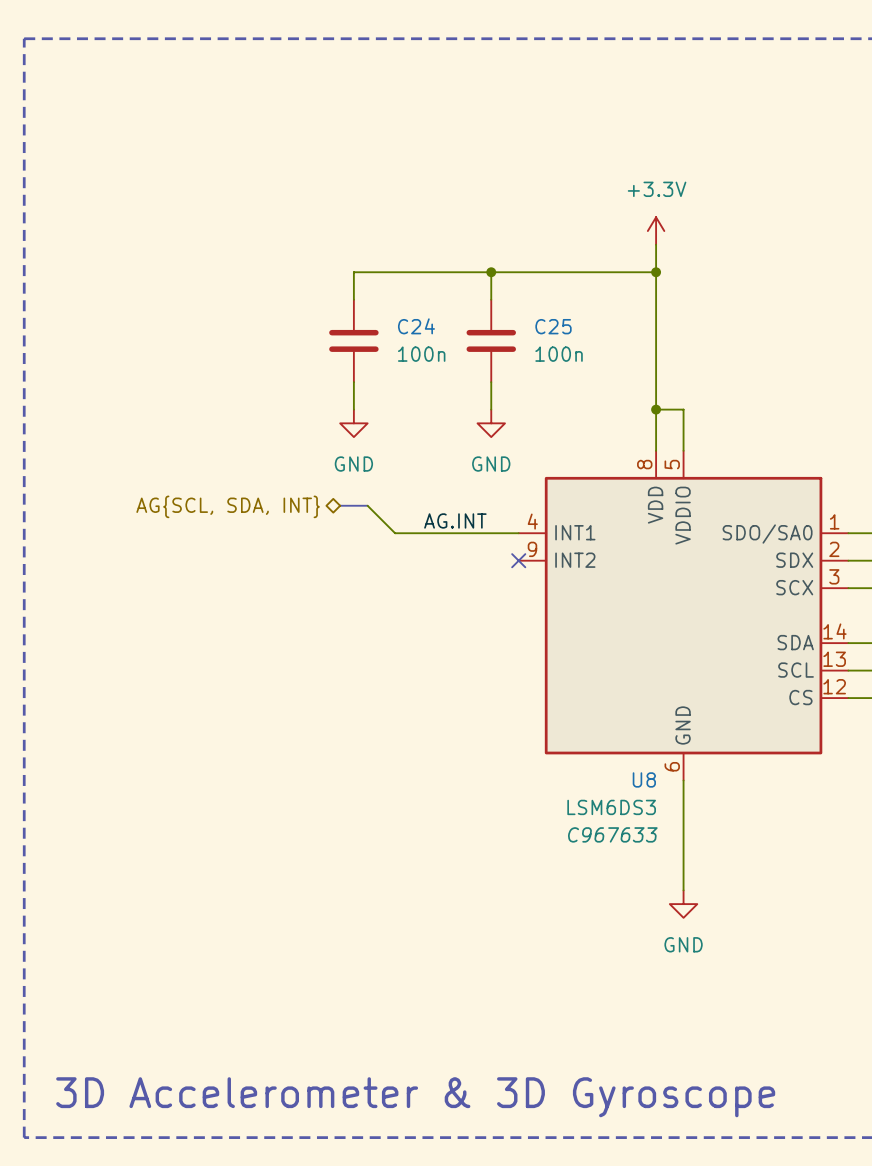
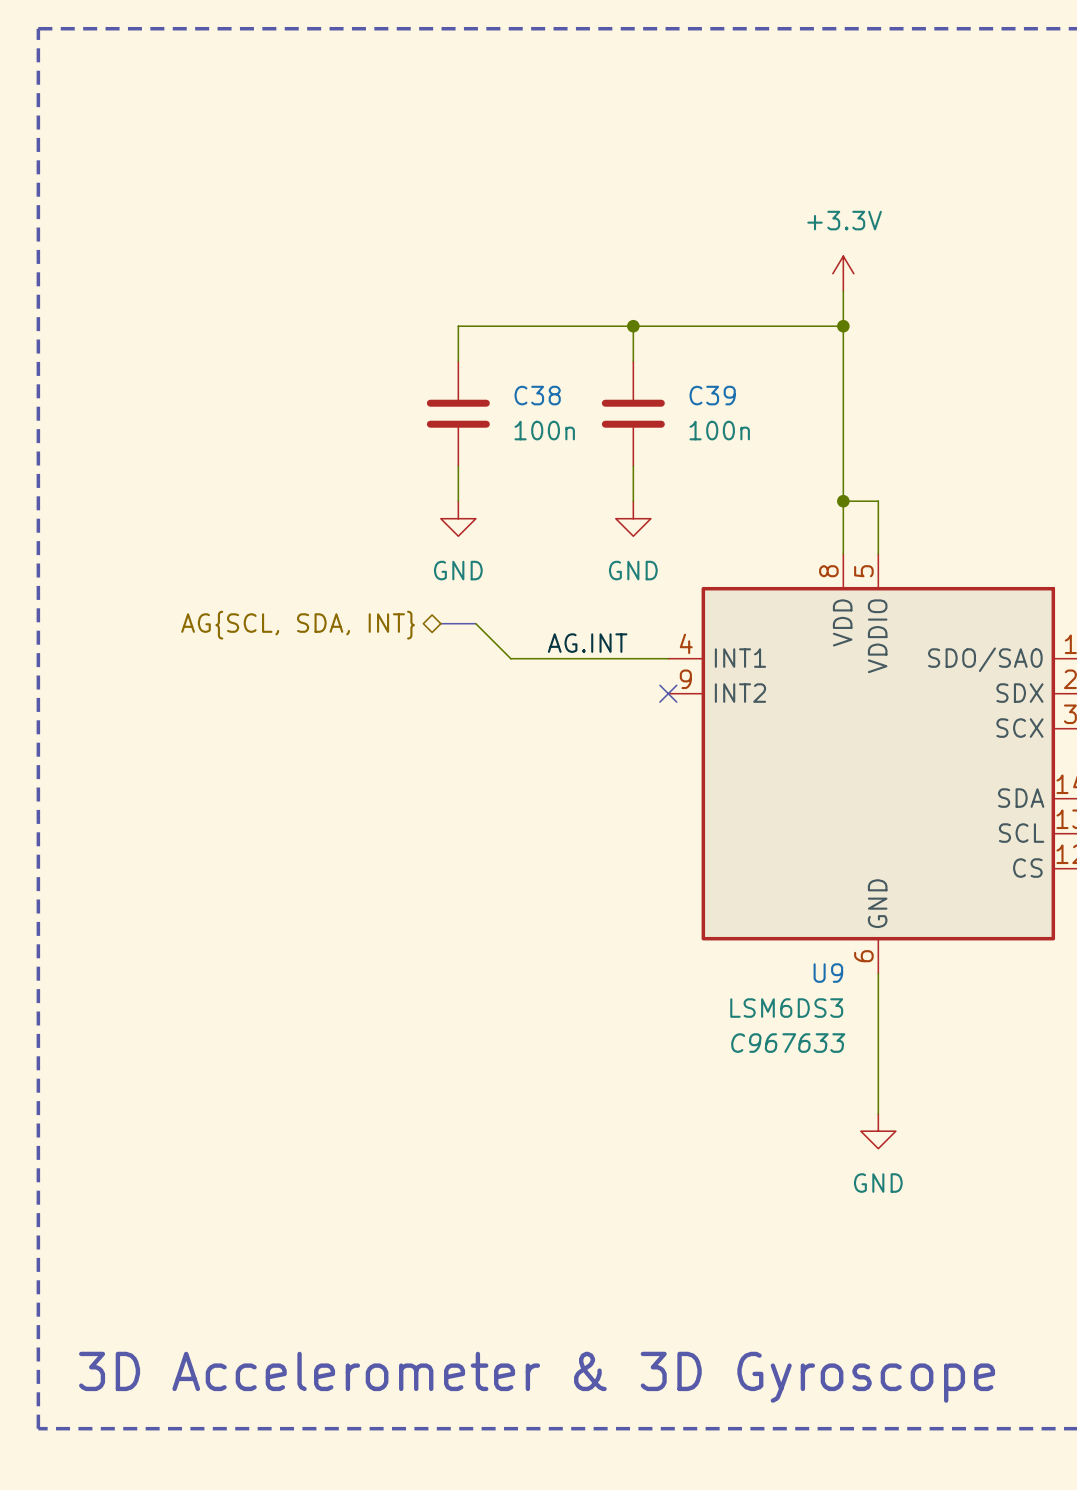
C24 name: C24 (416, 326) -> C38 (537, 395)
C25 name: C25 (553, 326) -> C39 (712, 395)
U8 name: U8 (644, 779) -> U9 (828, 973)

